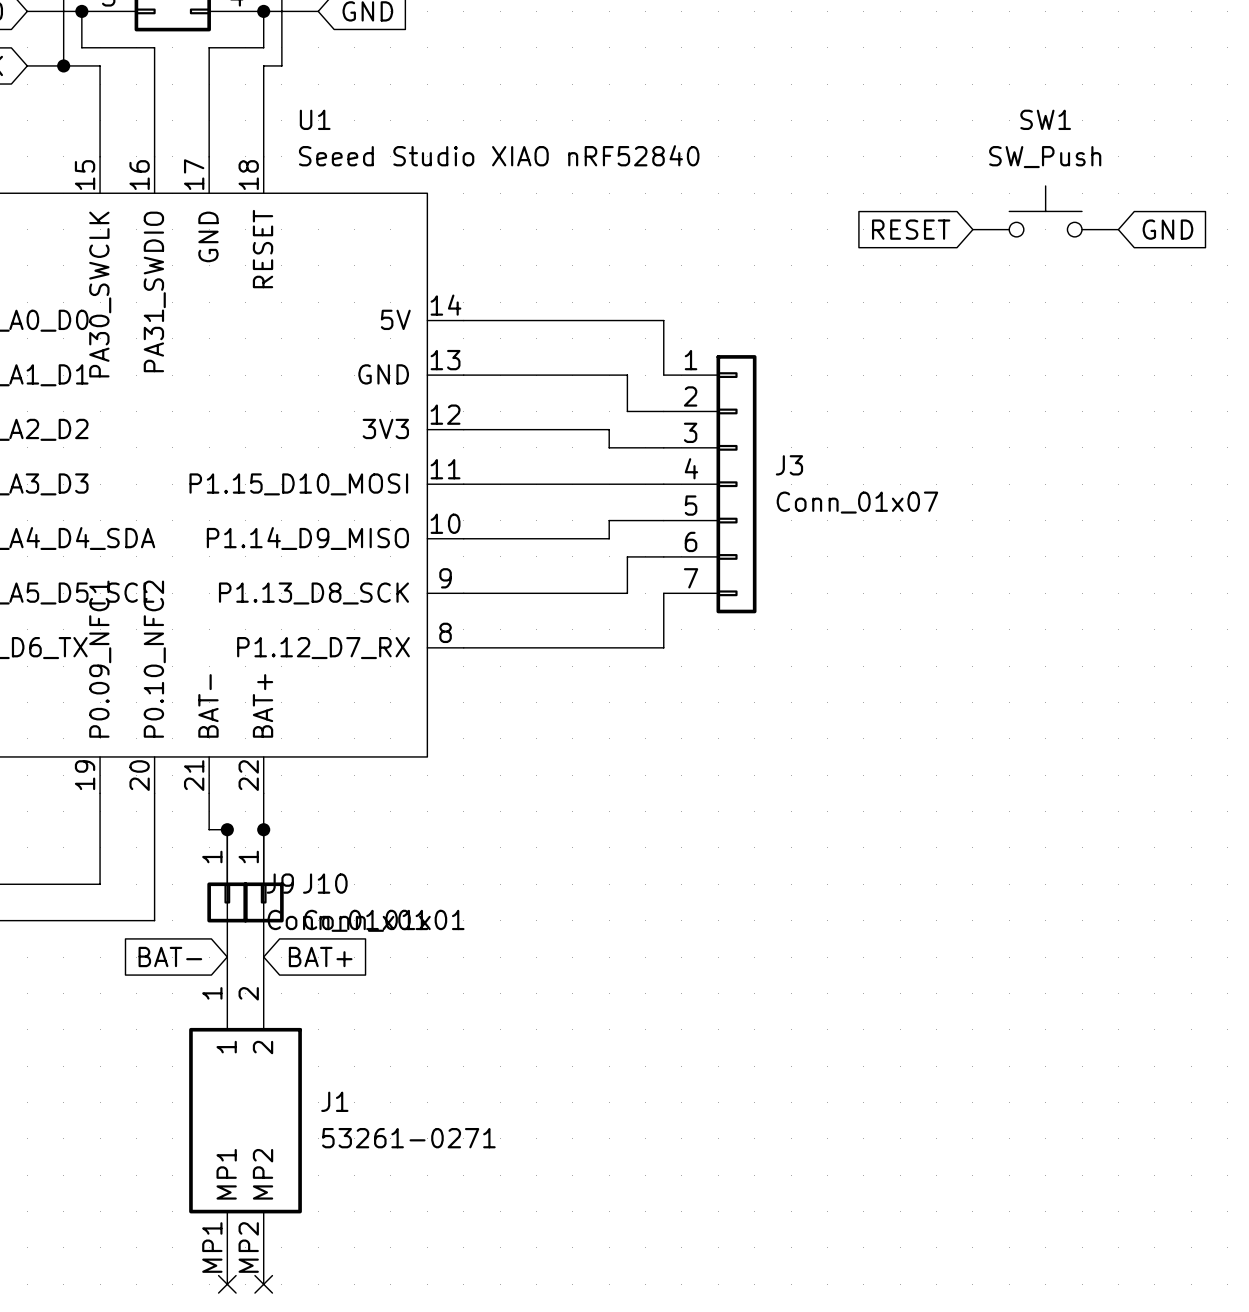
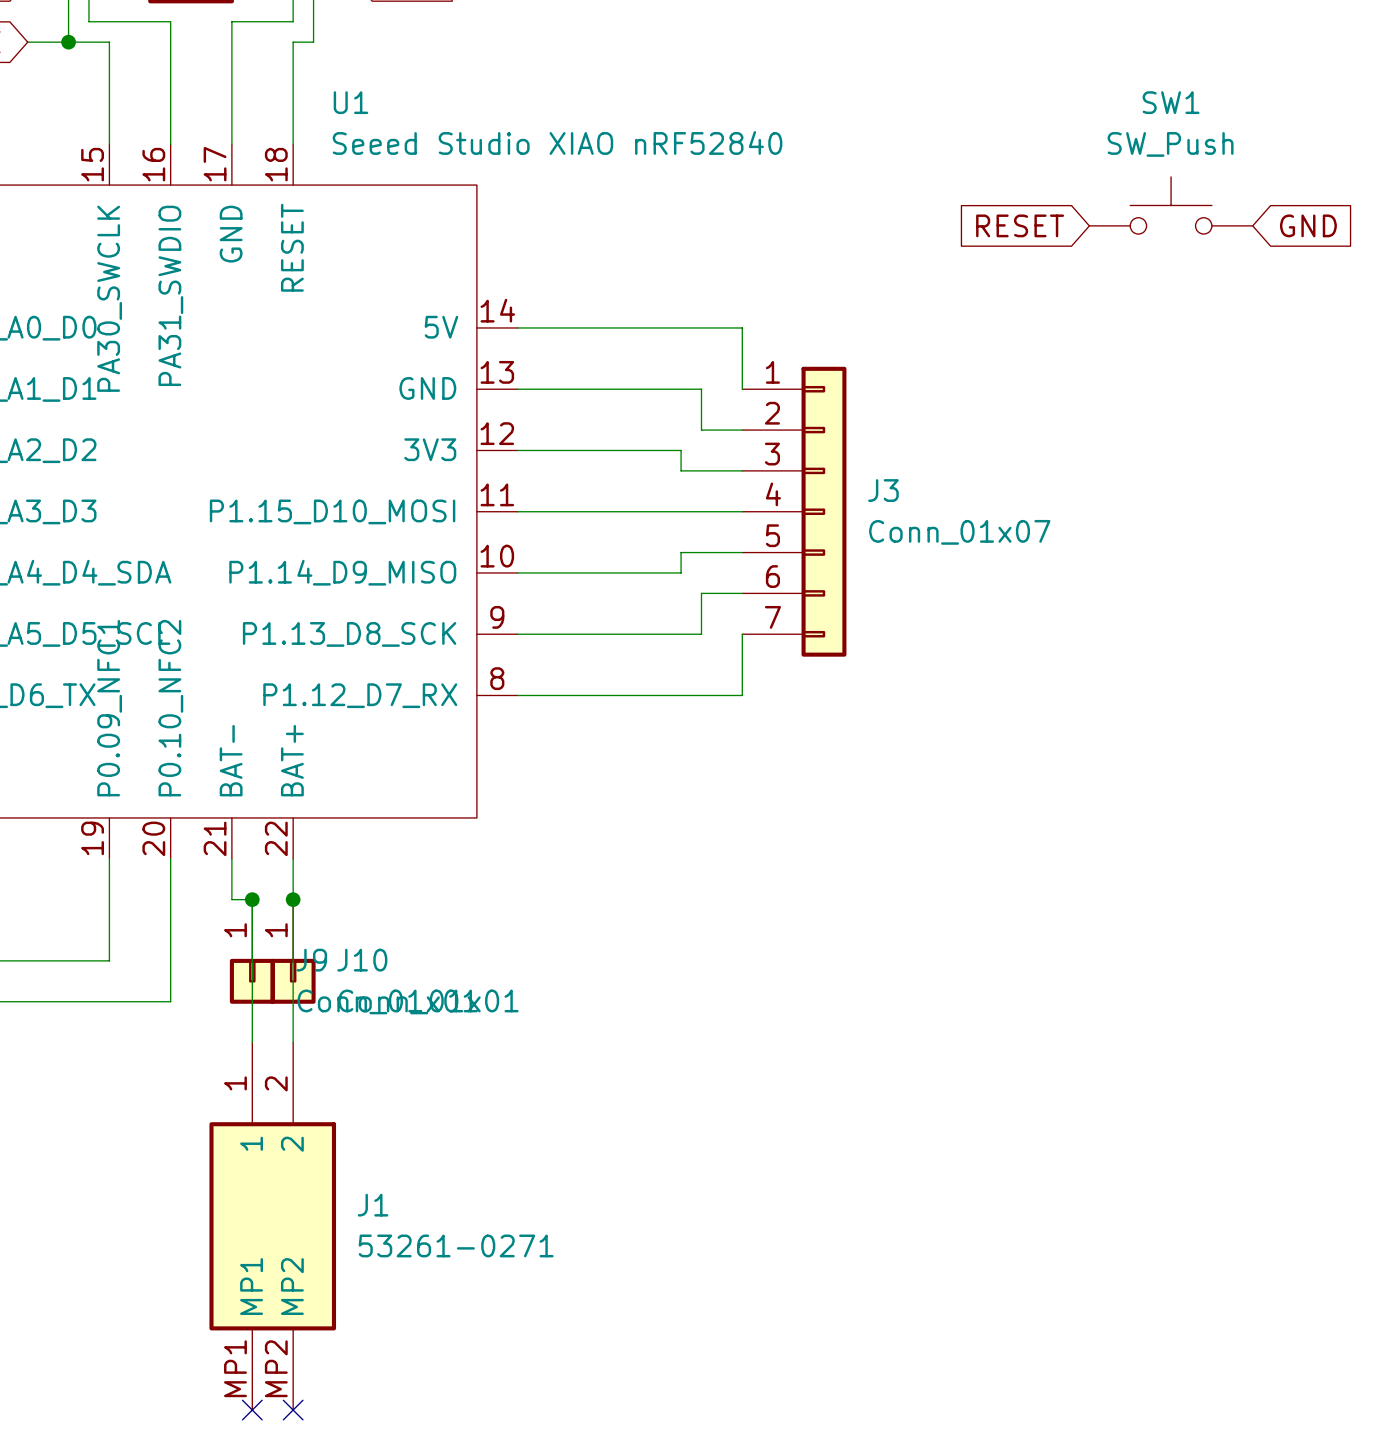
global label: BAT- (170, 957) -> none
global label: BAT+ (320, 957) -> none

